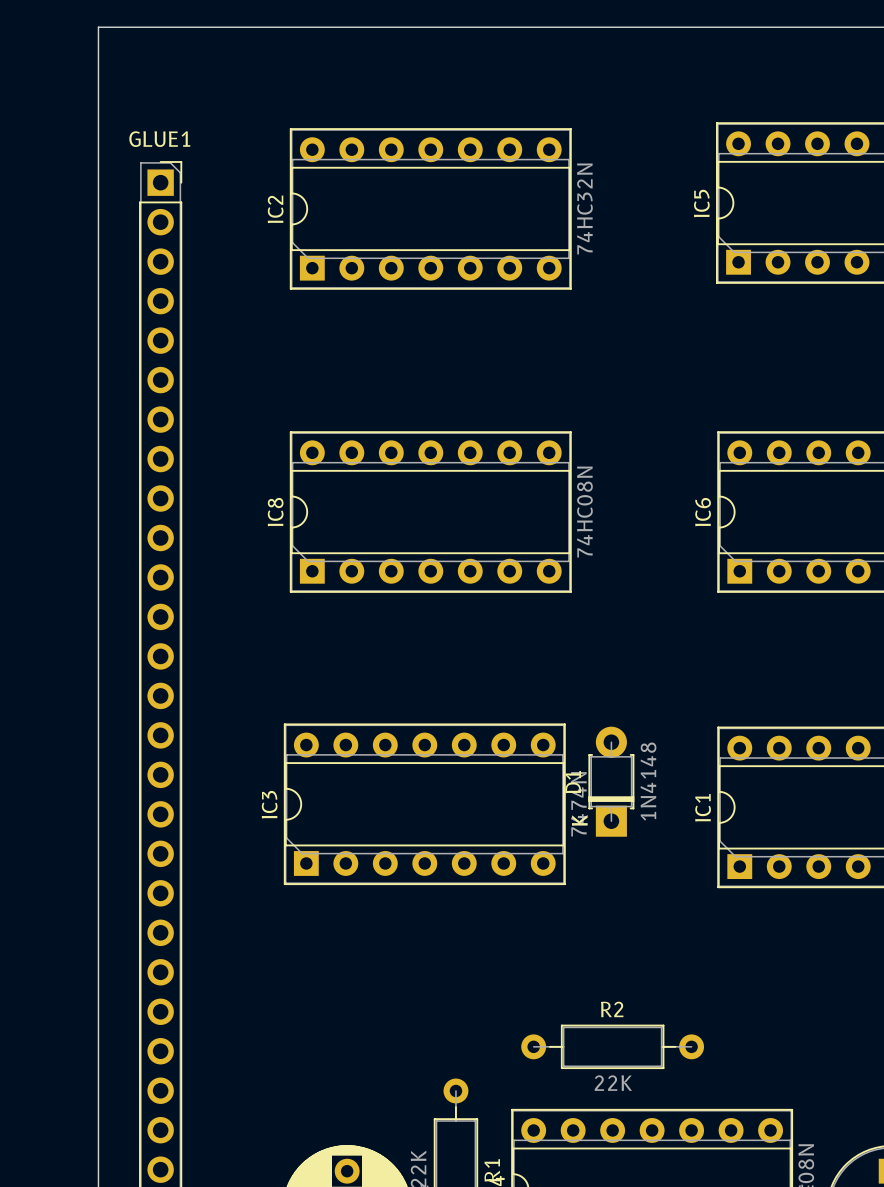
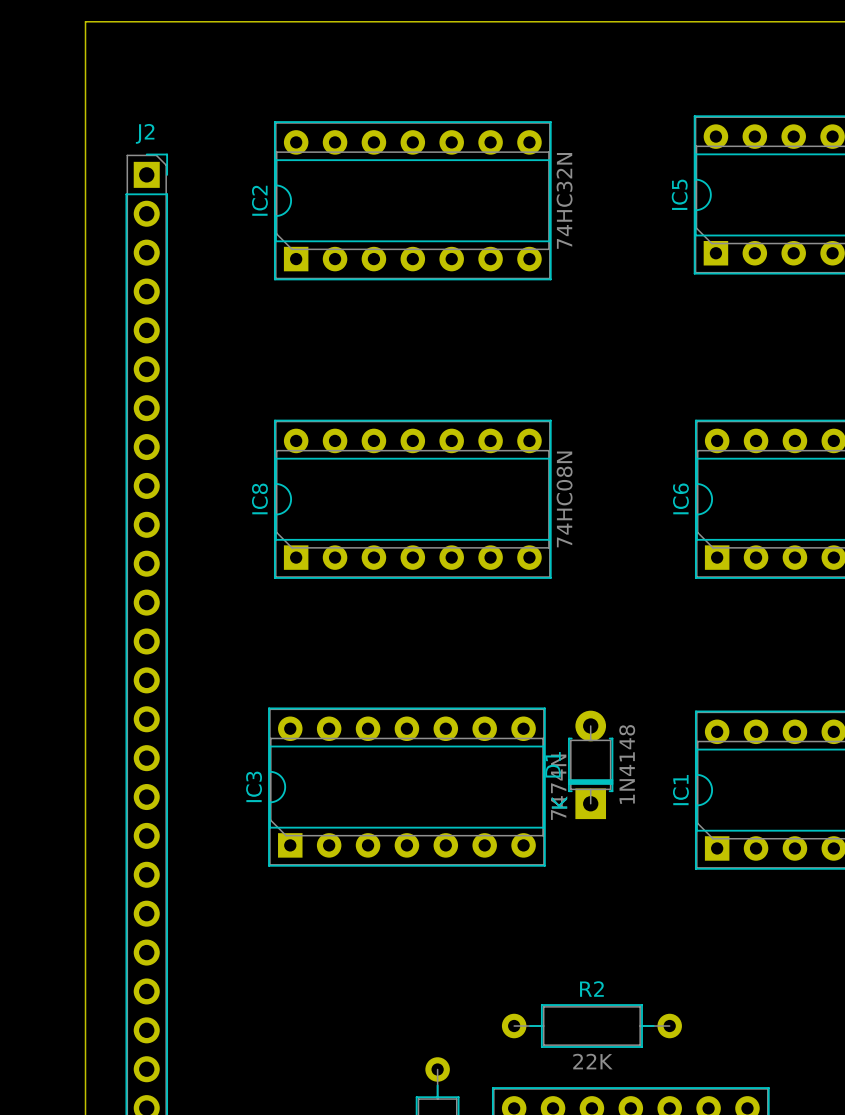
GLUE1 name: GLUE1 (159, 139) -> J2 (145, 133)

